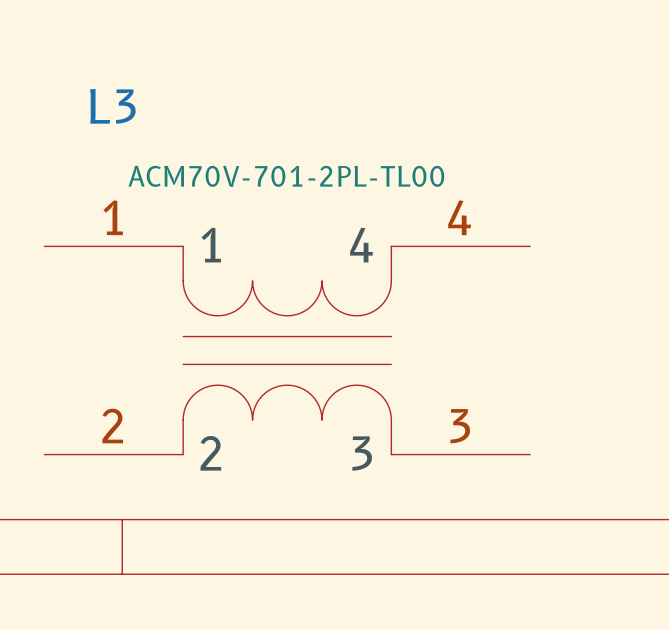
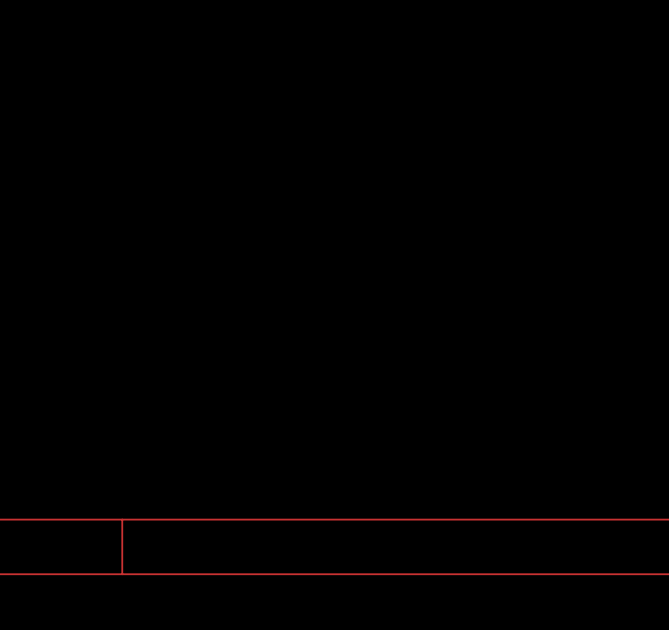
L3: ACM70V-701-2PL-TL00 (287, 350) -> none

